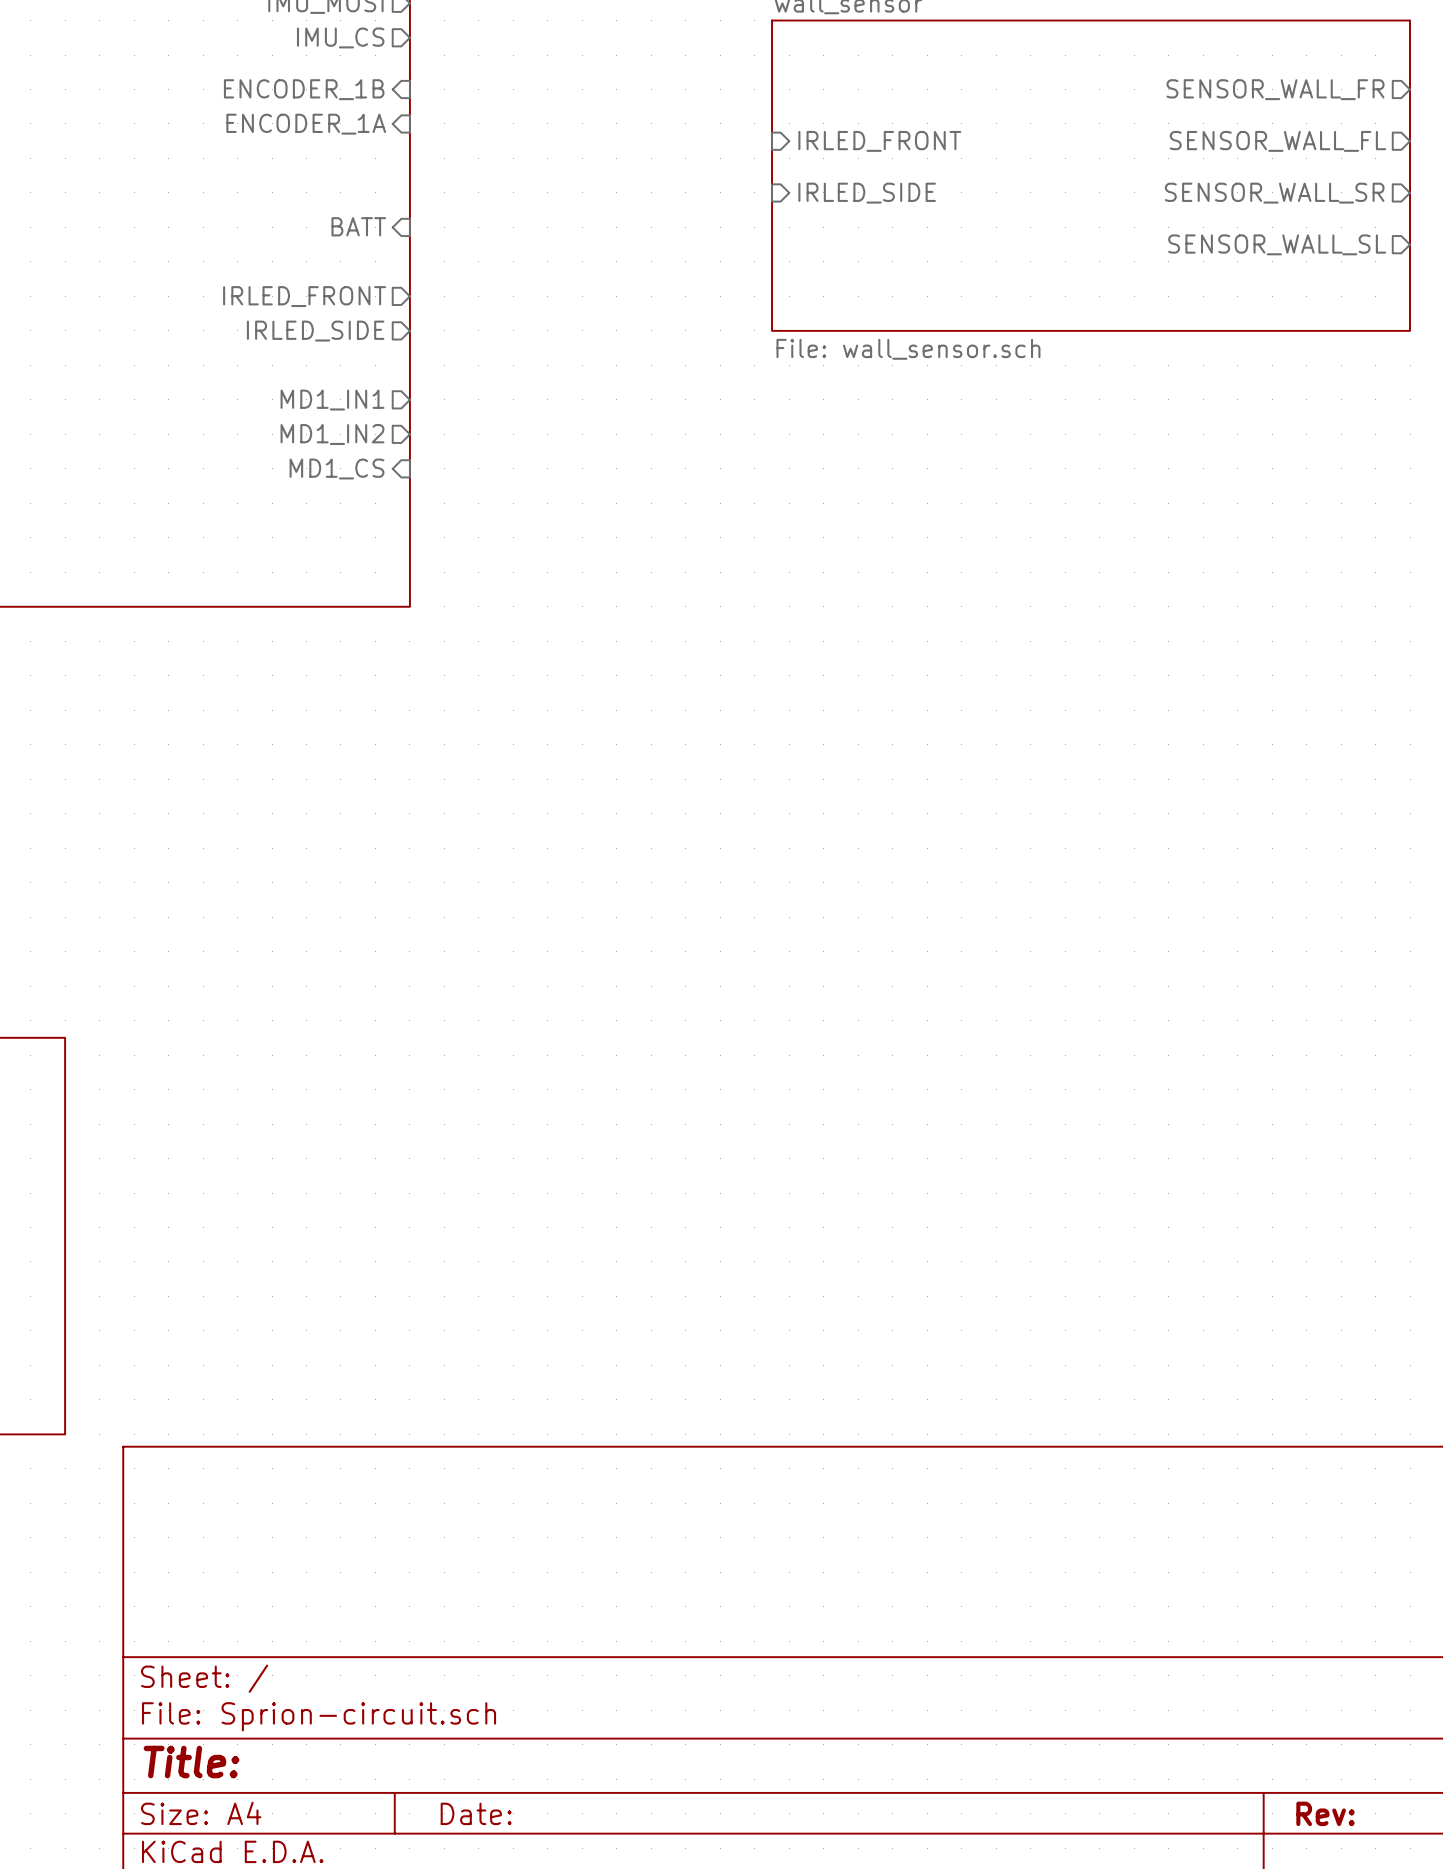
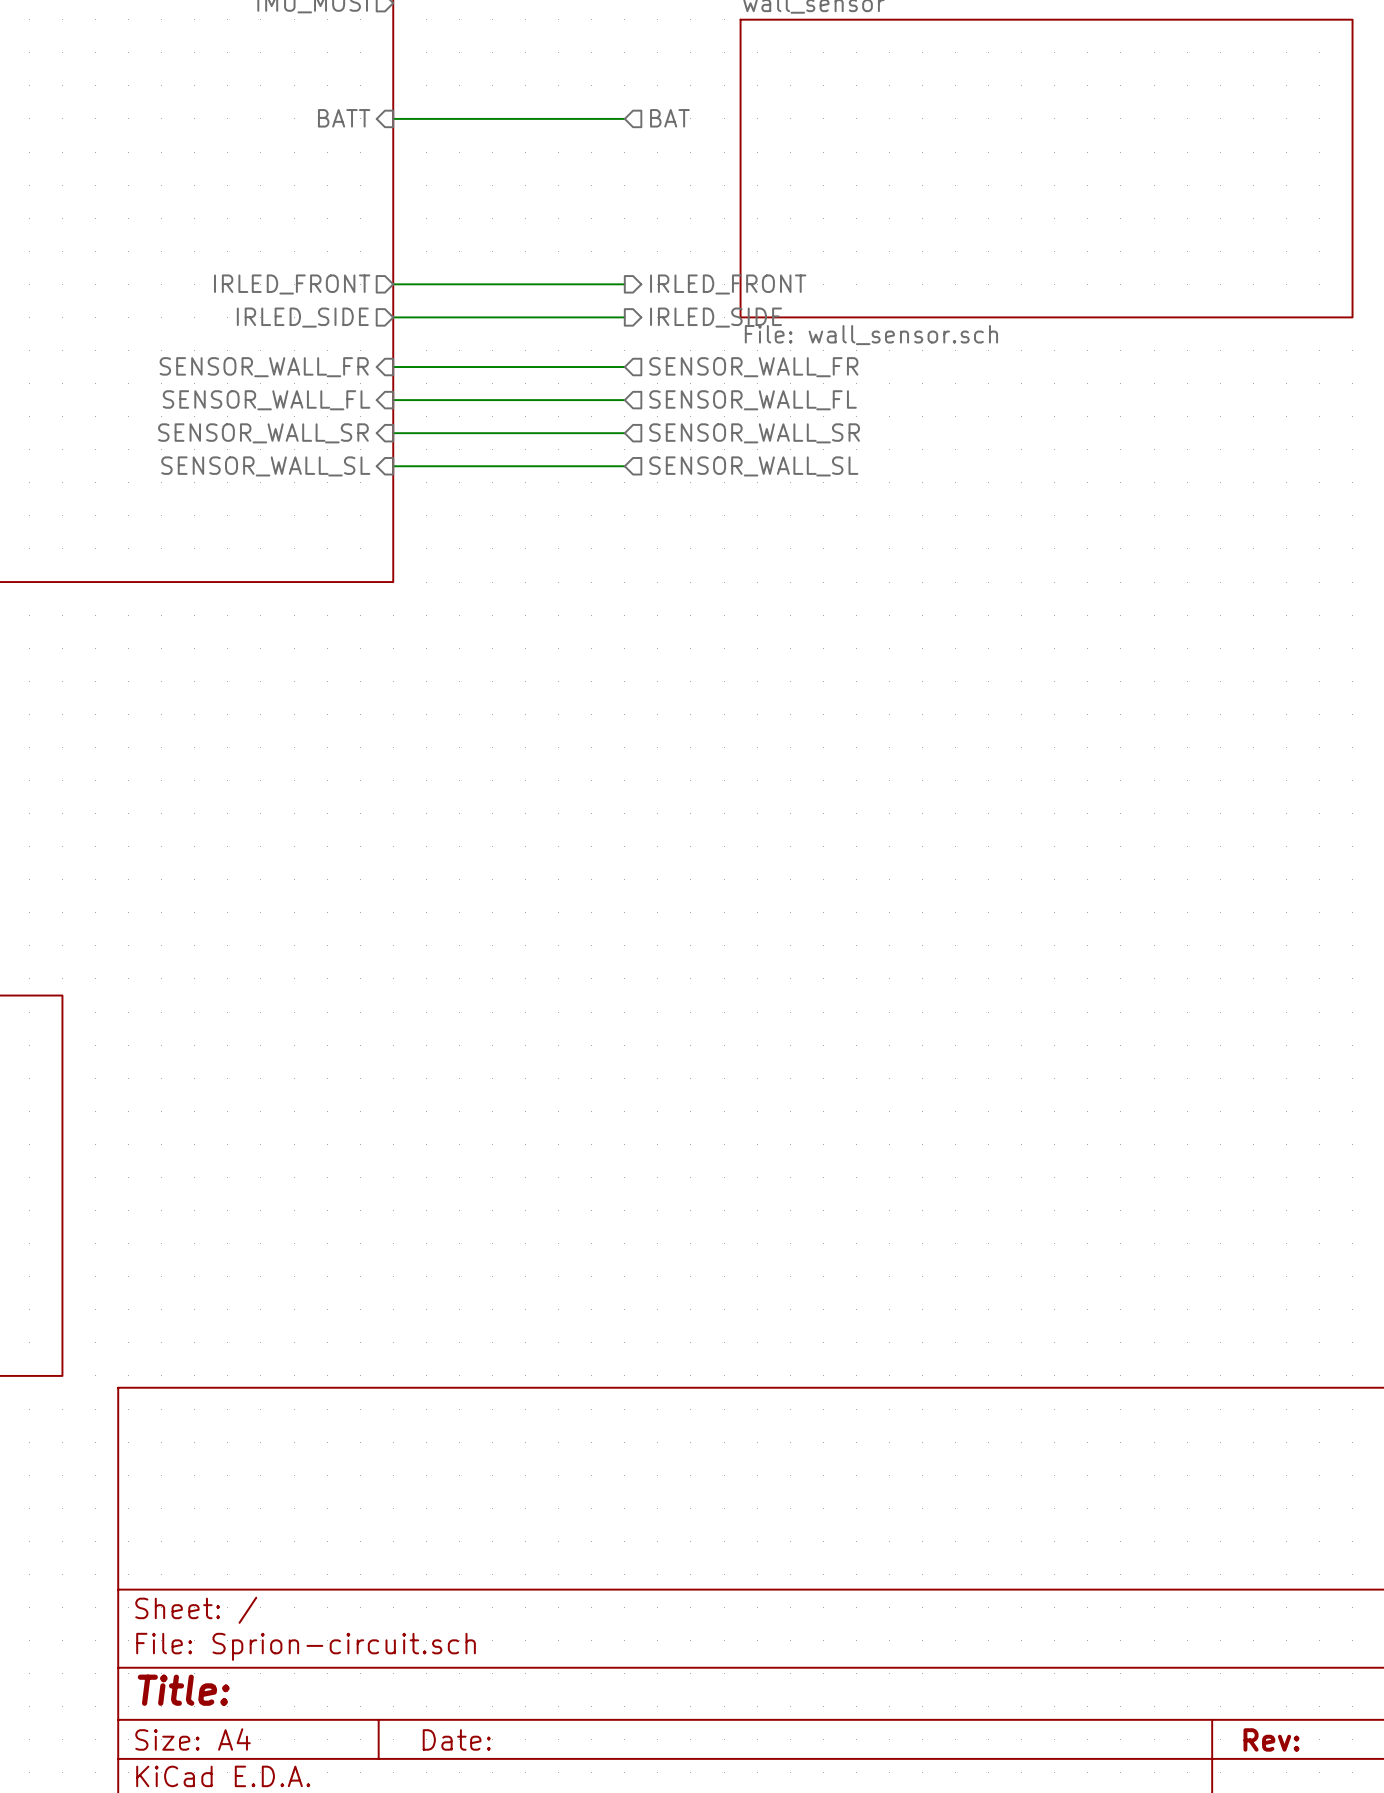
sheet pin: IMU_CS (340, 37) -> none
sheet pin: ENCODER_1B (304, 89) -> none
sheet pin: SENSOR_WALL_FR (1275, 89) -> none
wire: none -> (393, 118) (624, 118)
sheet pin: none -> BAT (669, 118)
sheet pin: ENCODER_1A (306, 124) -> BATT (344, 118)
sheet pin position: IRLED_FRONT (879, 141) -> IRLED_FRONT (728, 284)
sheet pin: SENSOR_WALL_FL (1277, 141) -> none
sheet pin position: IRLED_SIDE (867, 193) -> IRLED_SIDE (716, 317)
sheet pin: SENSOR_WALL_SR (1274, 193) -> none
sheet pin: BATT (358, 226) -> none
sheet pin: SENSOR_WALL_SL (1277, 244) -> none
wire: none -> (393, 284) (624, 284)
wire: none -> (393, 317) (624, 317)
sheet pin: none -> SENSOR_WALL_FR (264, 367)
wire: none -> (393, 367) (624, 367)
sheet pin: none -> SENSOR_WALL_FR (753, 367)
sheet pin: MD1_IN1 (332, 400) -> none
sheet pin: none -> SENSOR_WALL_FL (266, 400)
wire: none -> (393, 400) (624, 400)
sheet pin: none -> SENSOR_WALL_FL (753, 400)
sheet pin: MD1_IN2 (332, 434) -> none
sheet pin: none -> SENSOR_WALL_SR (263, 433)
wire: none -> (393, 433) (624, 433)
sheet pin: none -> SENSOR_WALL_SR (754, 433)
sheet pin: MD1_CS (337, 469) -> none
sheet pin: none -> SENSOR_WALL_SL (265, 466)
wire: none -> (393, 466) (624, 466)
sheet pin: none -> SENSOR_WALL_SL (753, 466)

